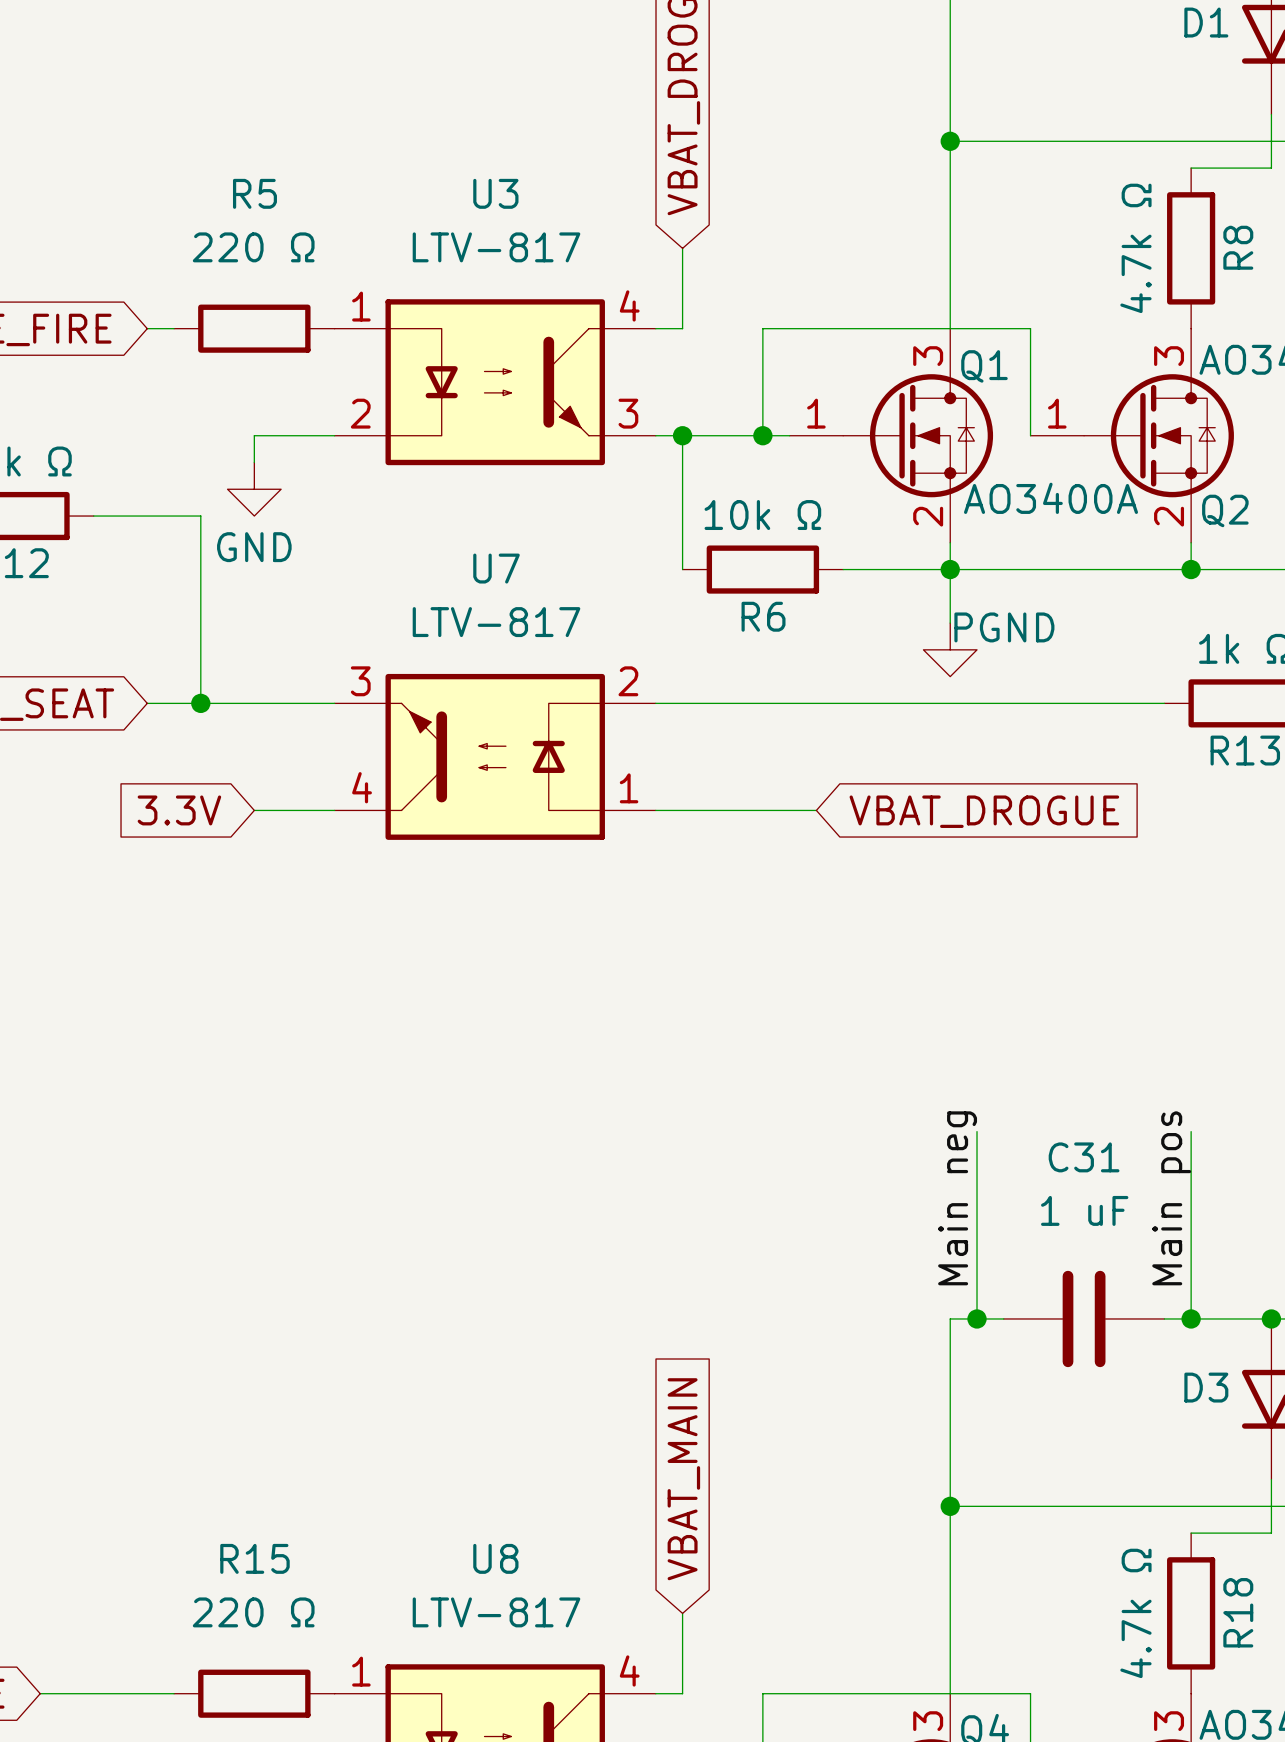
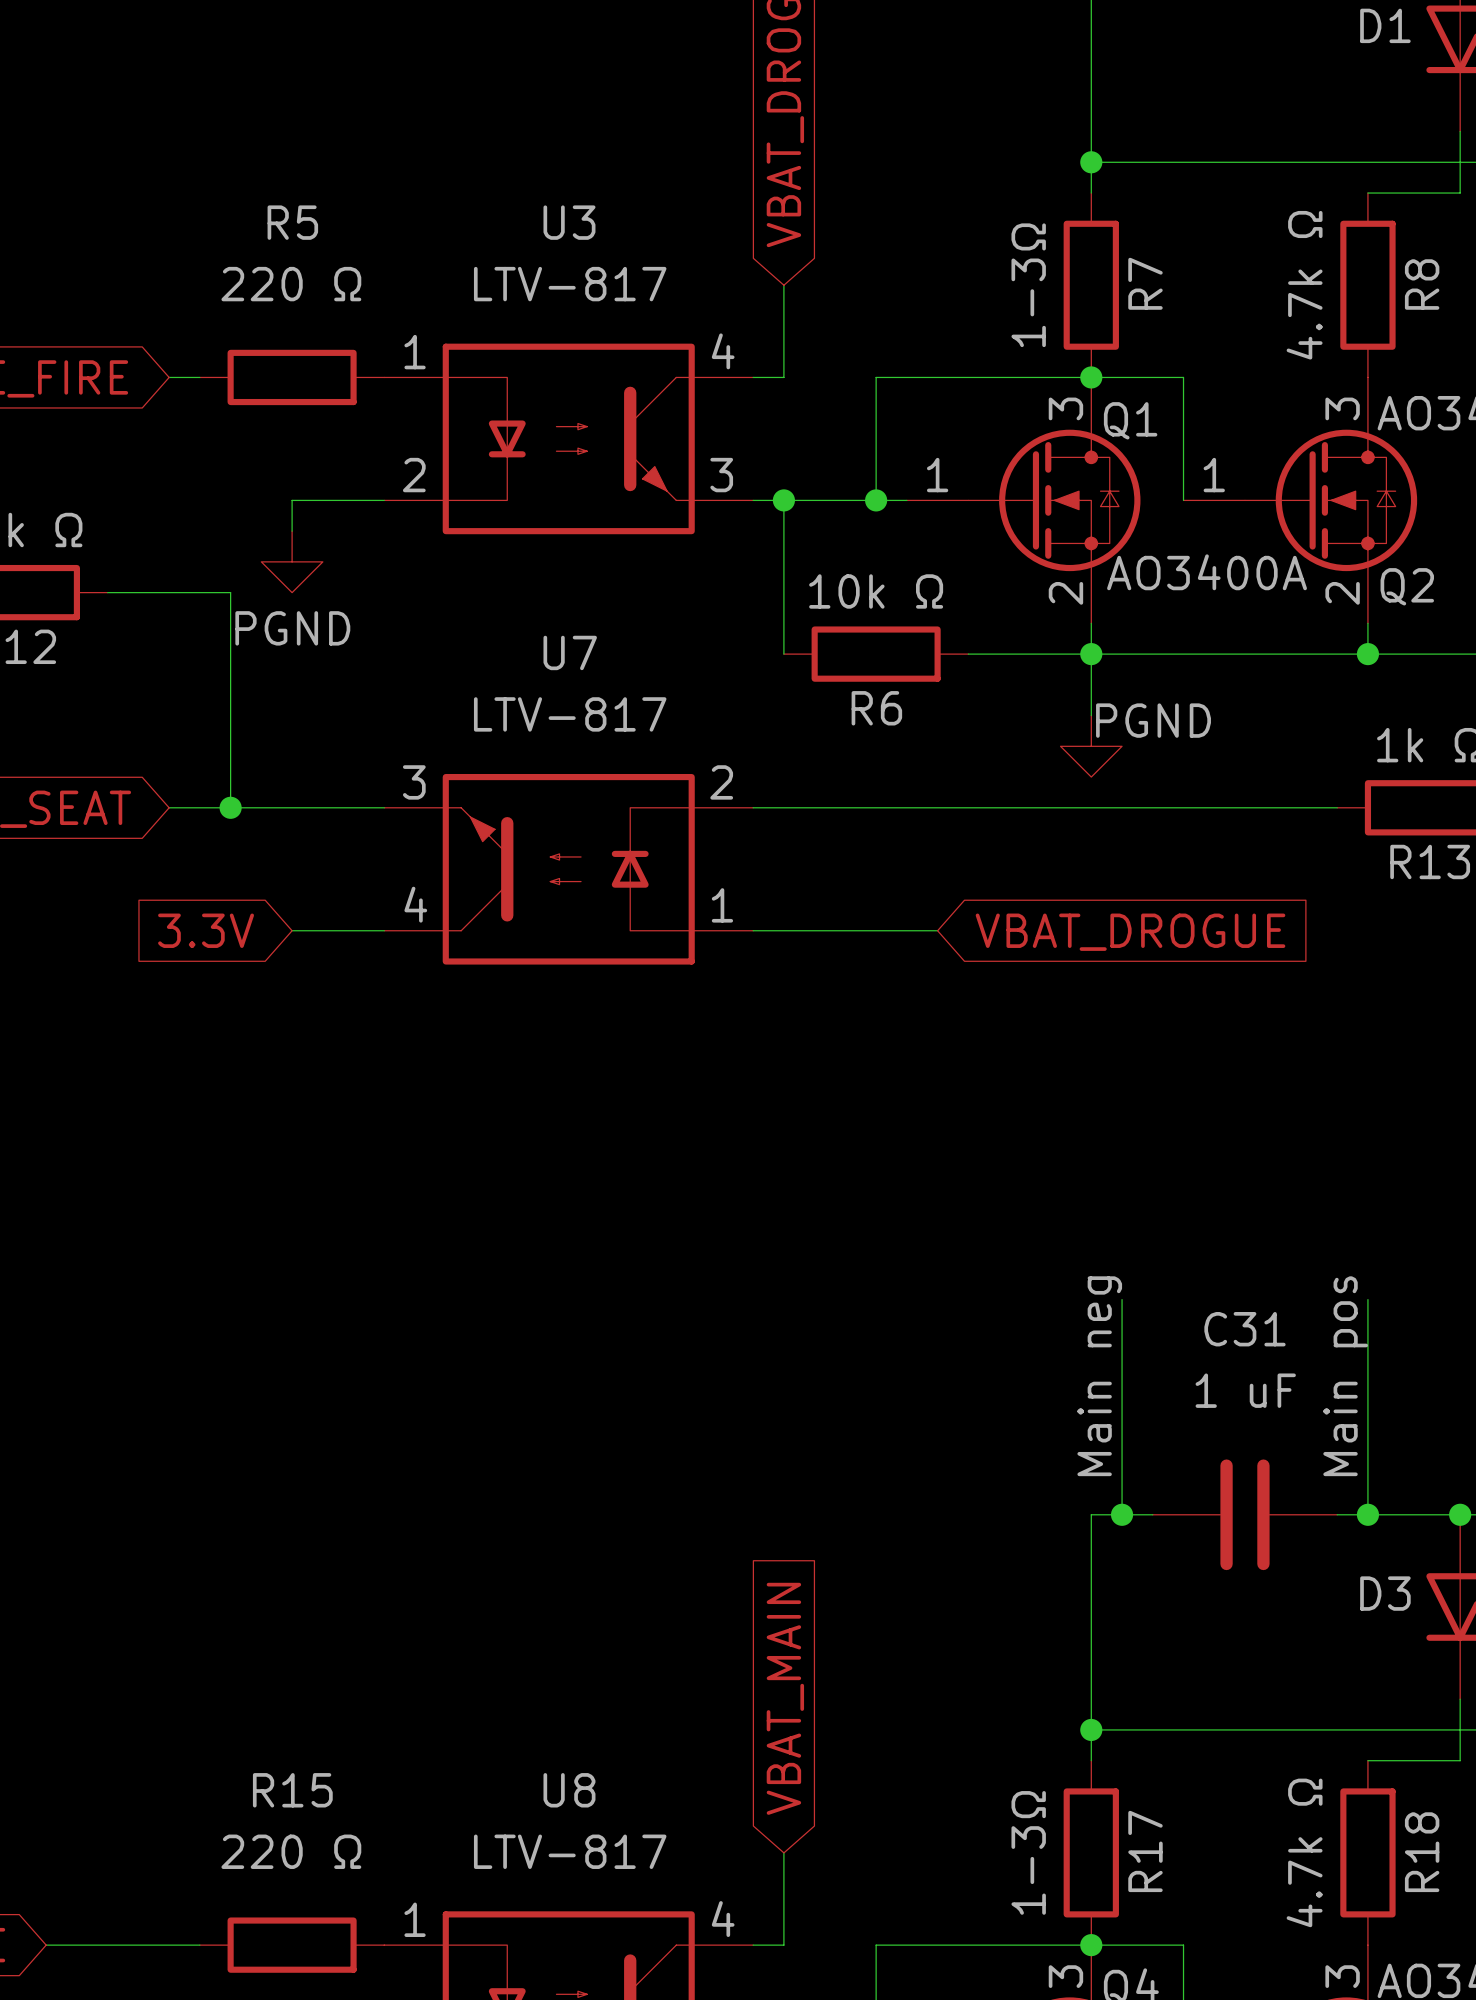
wire: (950, 168) (950, 328) -> none
R7: none -> 1-3Ω (1091, 285)
junction: none -> (1091, 377)
power symbol: GND (254, 489) -> PGND (292, 561)
wire: (950, 1533) (950, 1693) -> none
R17: none -> 1-3Ω (1091, 1852)
junction: none -> (1091, 1945)

